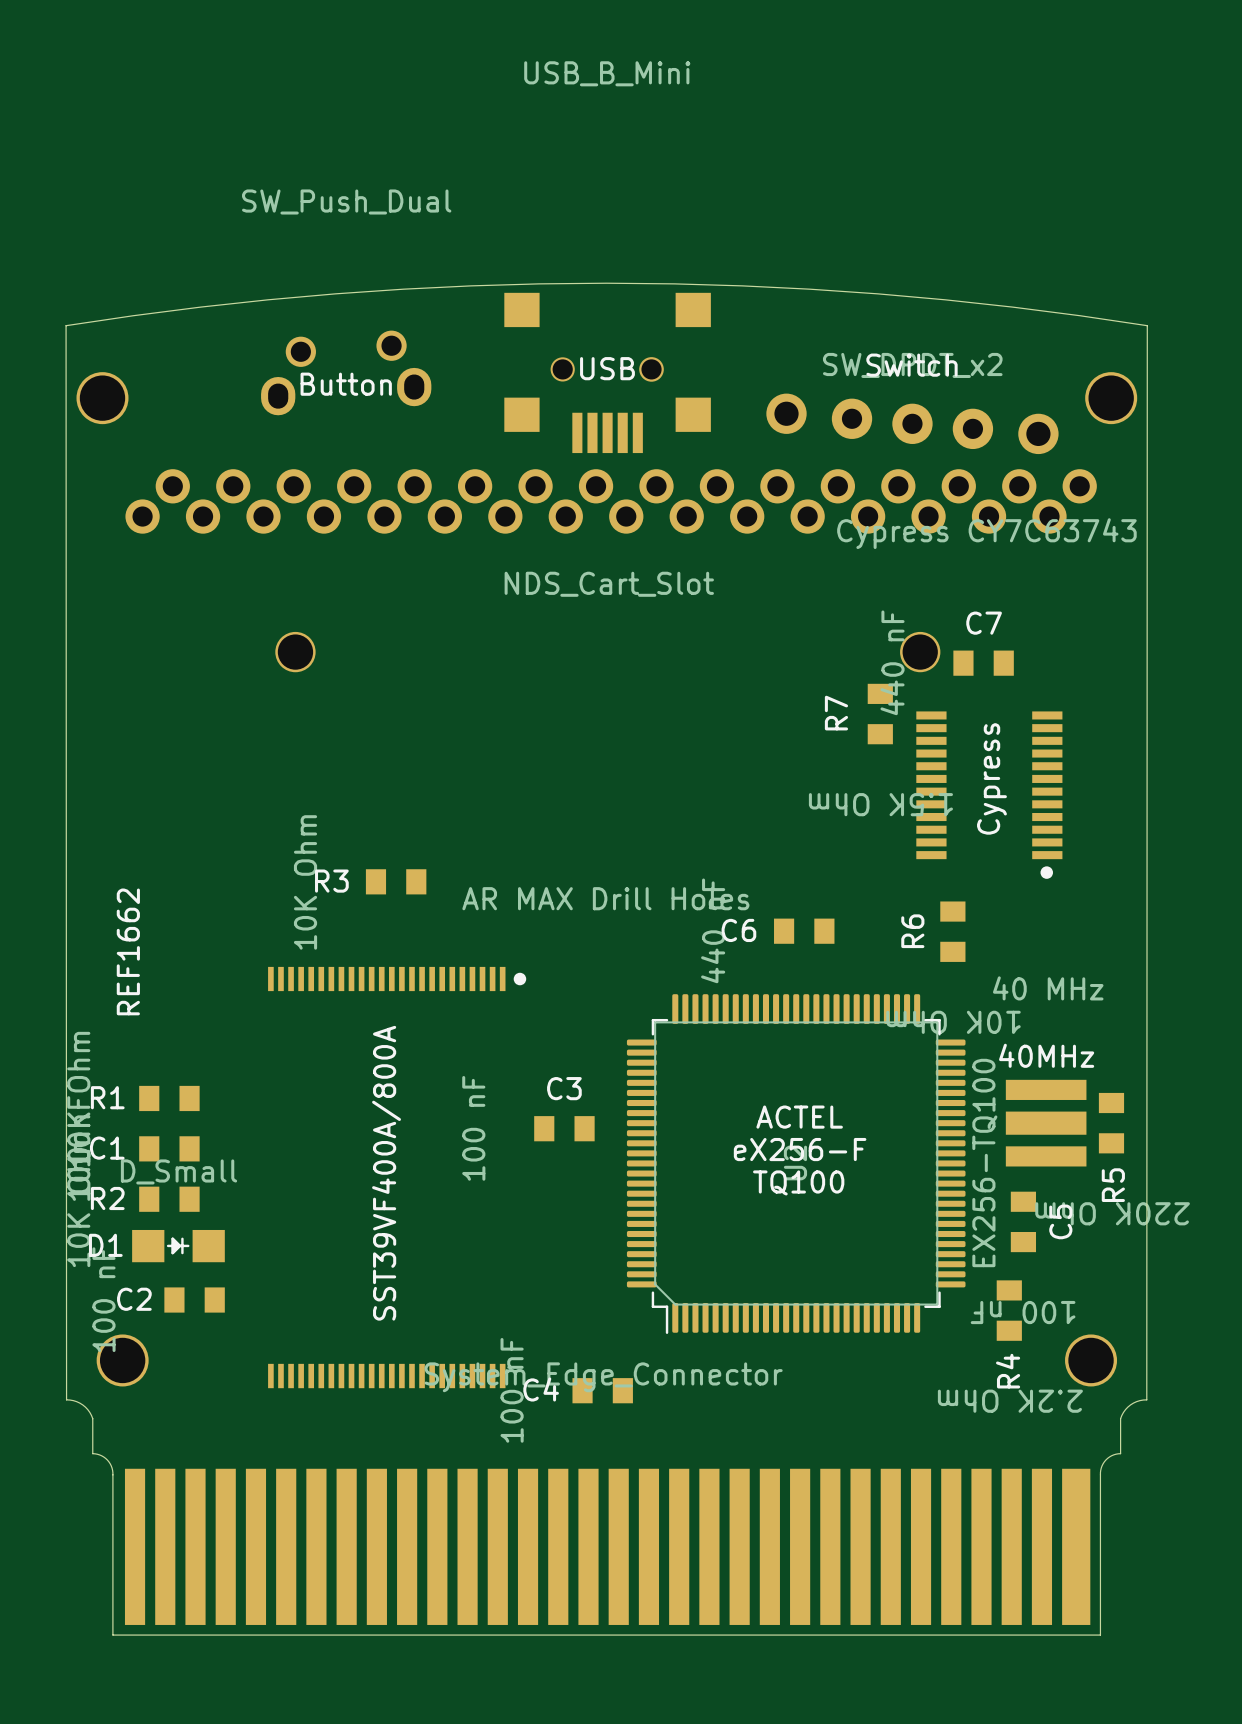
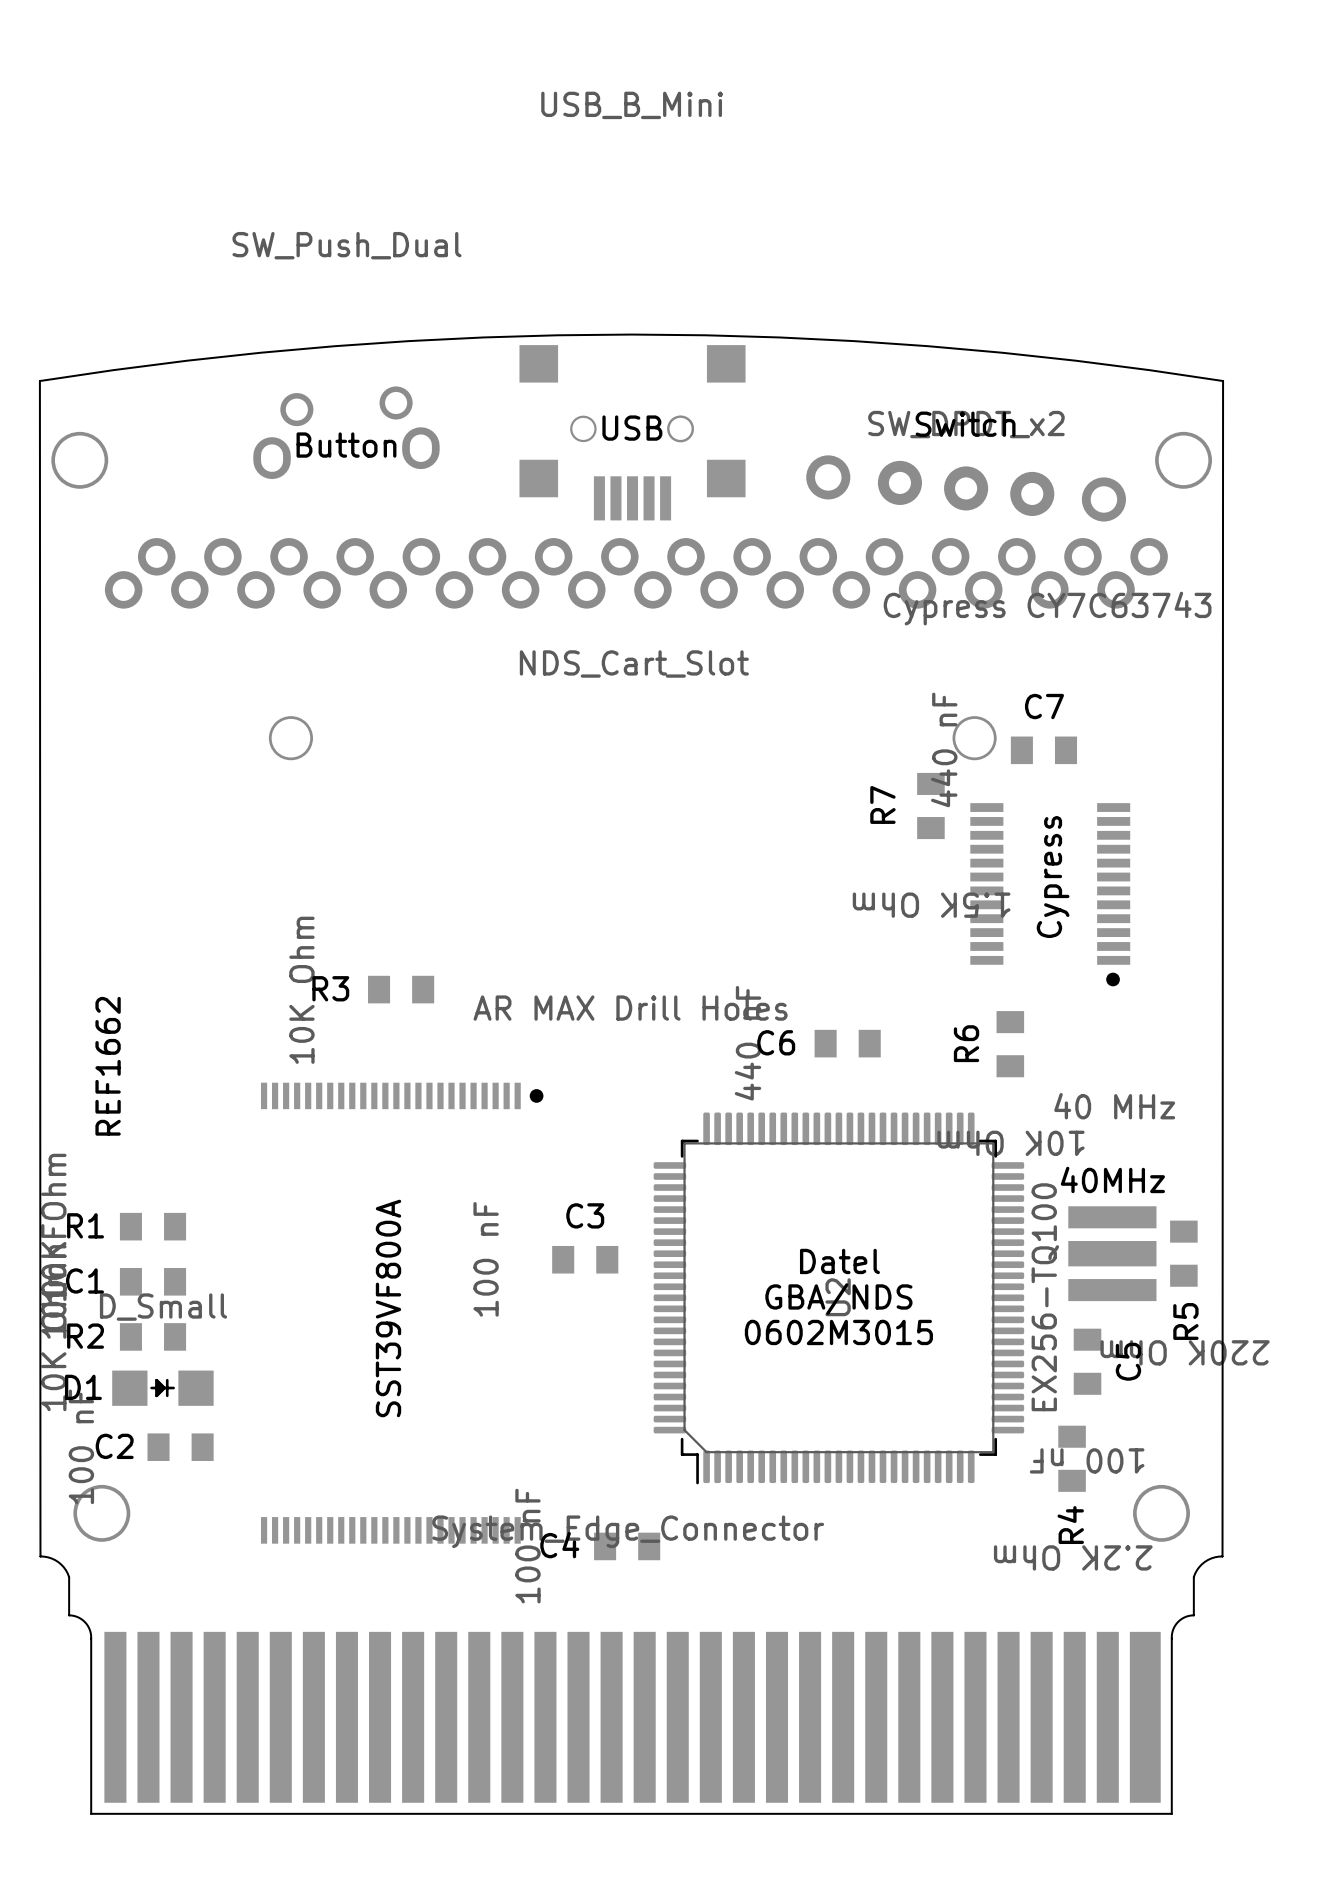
text: ACTEL (799, 1117) -> none
text: none -> Datel (839, 1261)
text: eX256-F (800, 1149) -> none
text: none -> GBA/NDS (838, 1299)
part value: SST39VF400A/800A (386, 1173) -> SST39VF800A (388, 1308)
text: TQ100 (798, 1182) -> none
text: none -> 0602M3015 (838, 1332)

